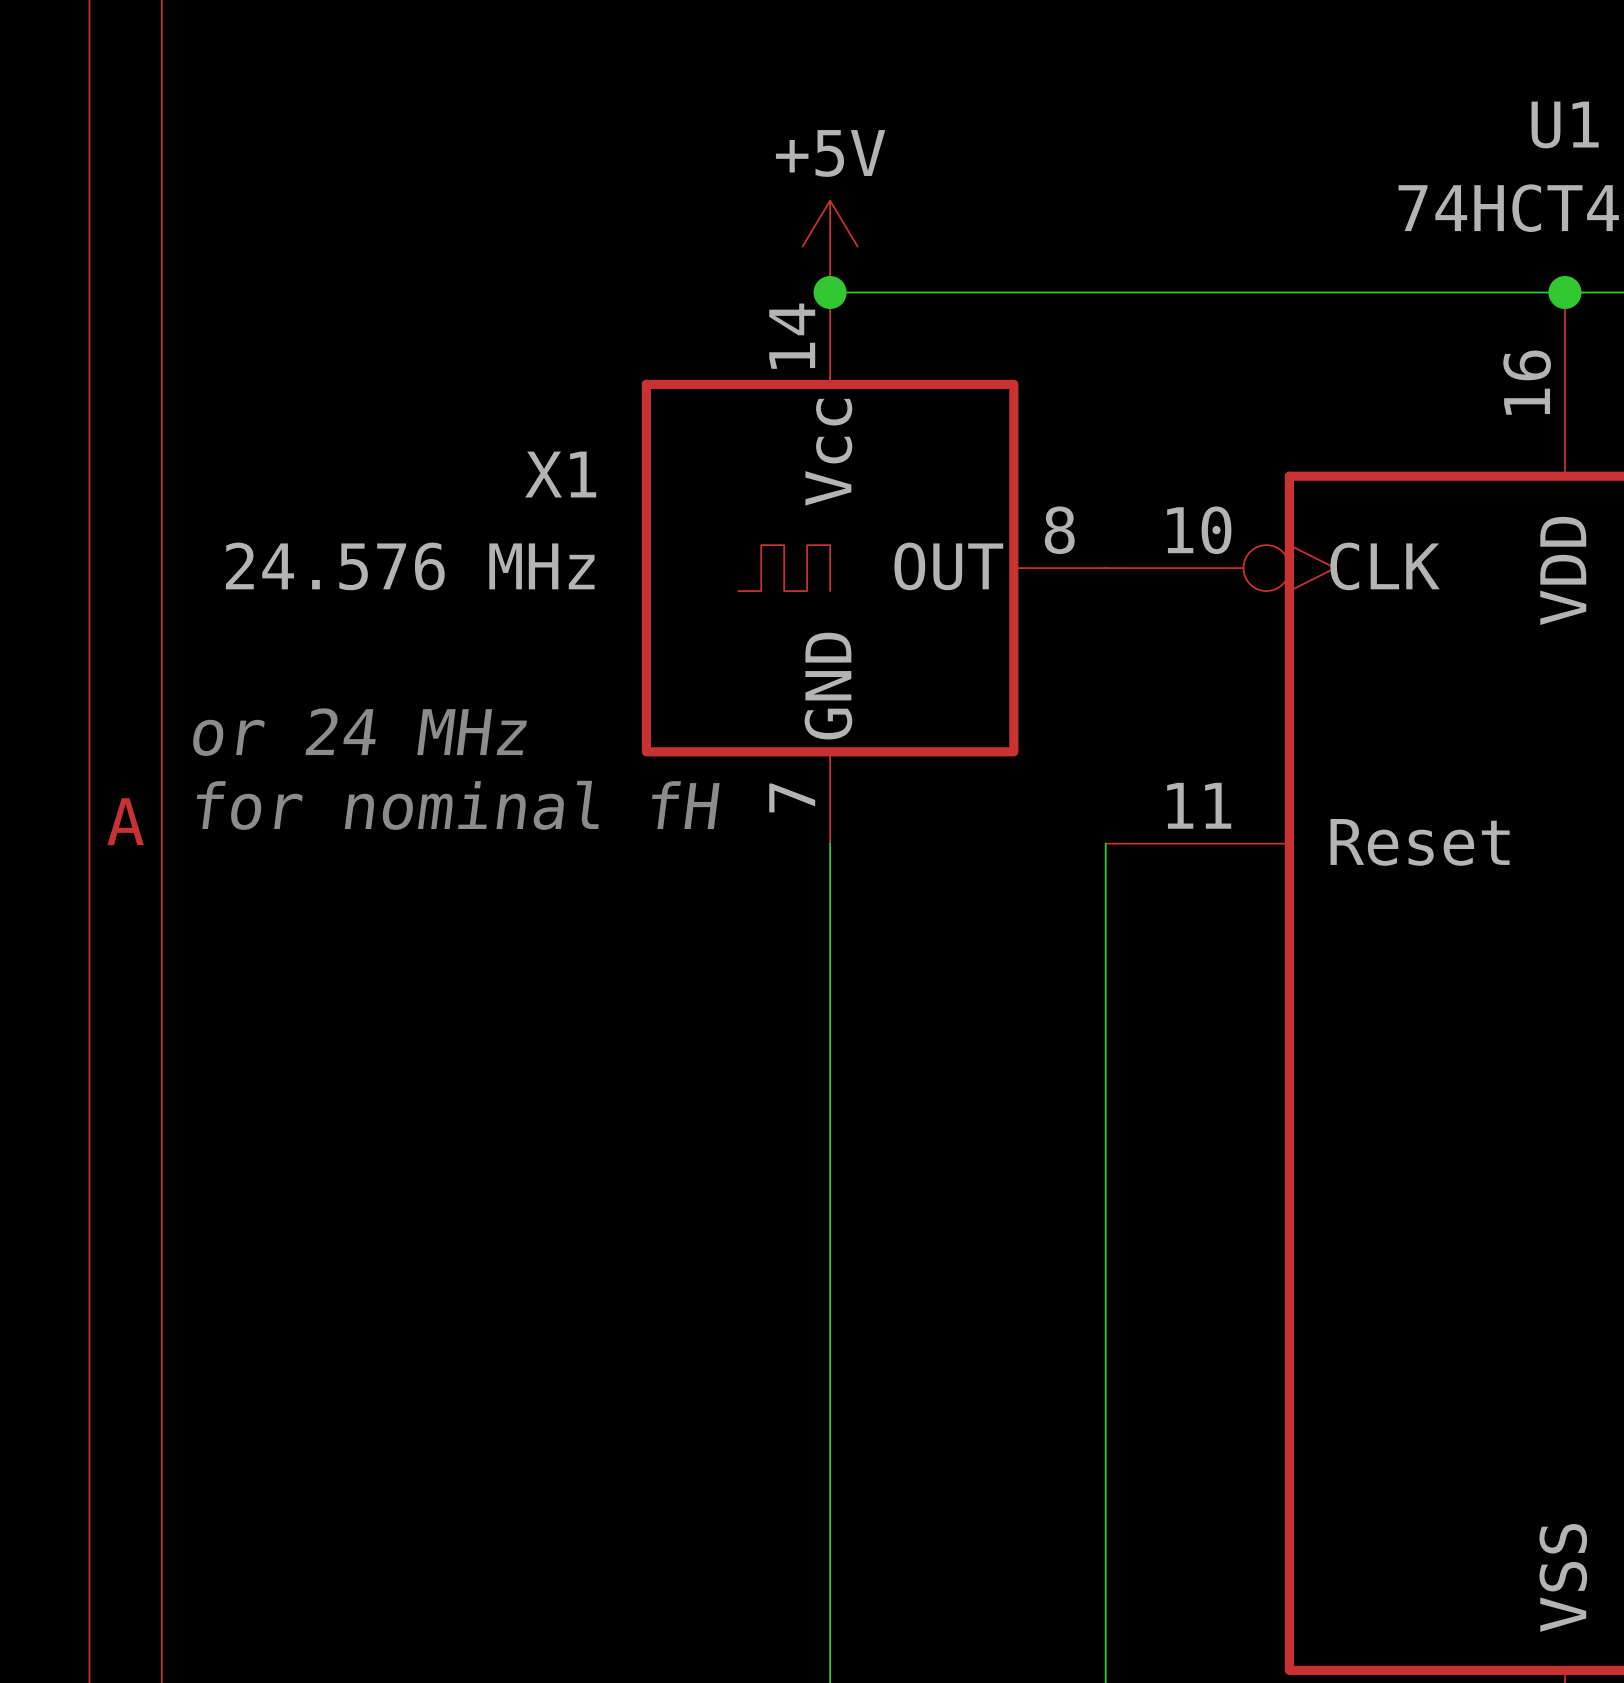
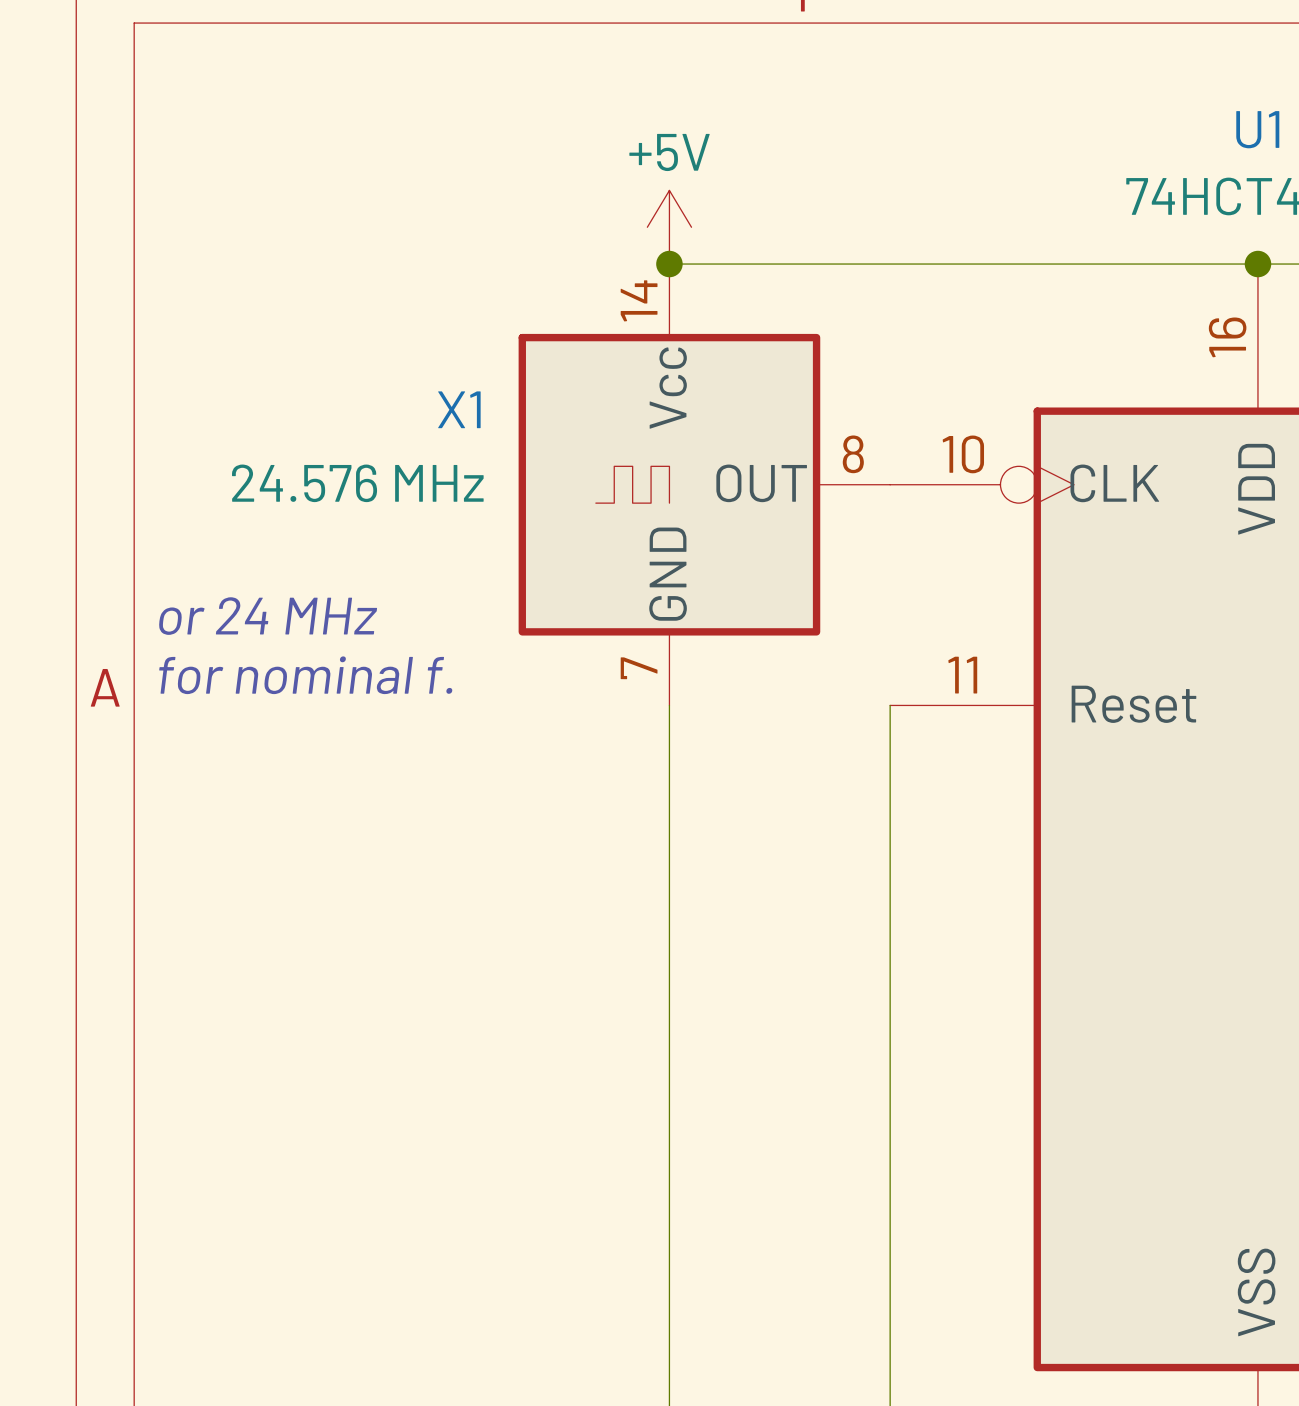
text: for nominal fH (458, 805) -> for nominal f. (305, 675)

